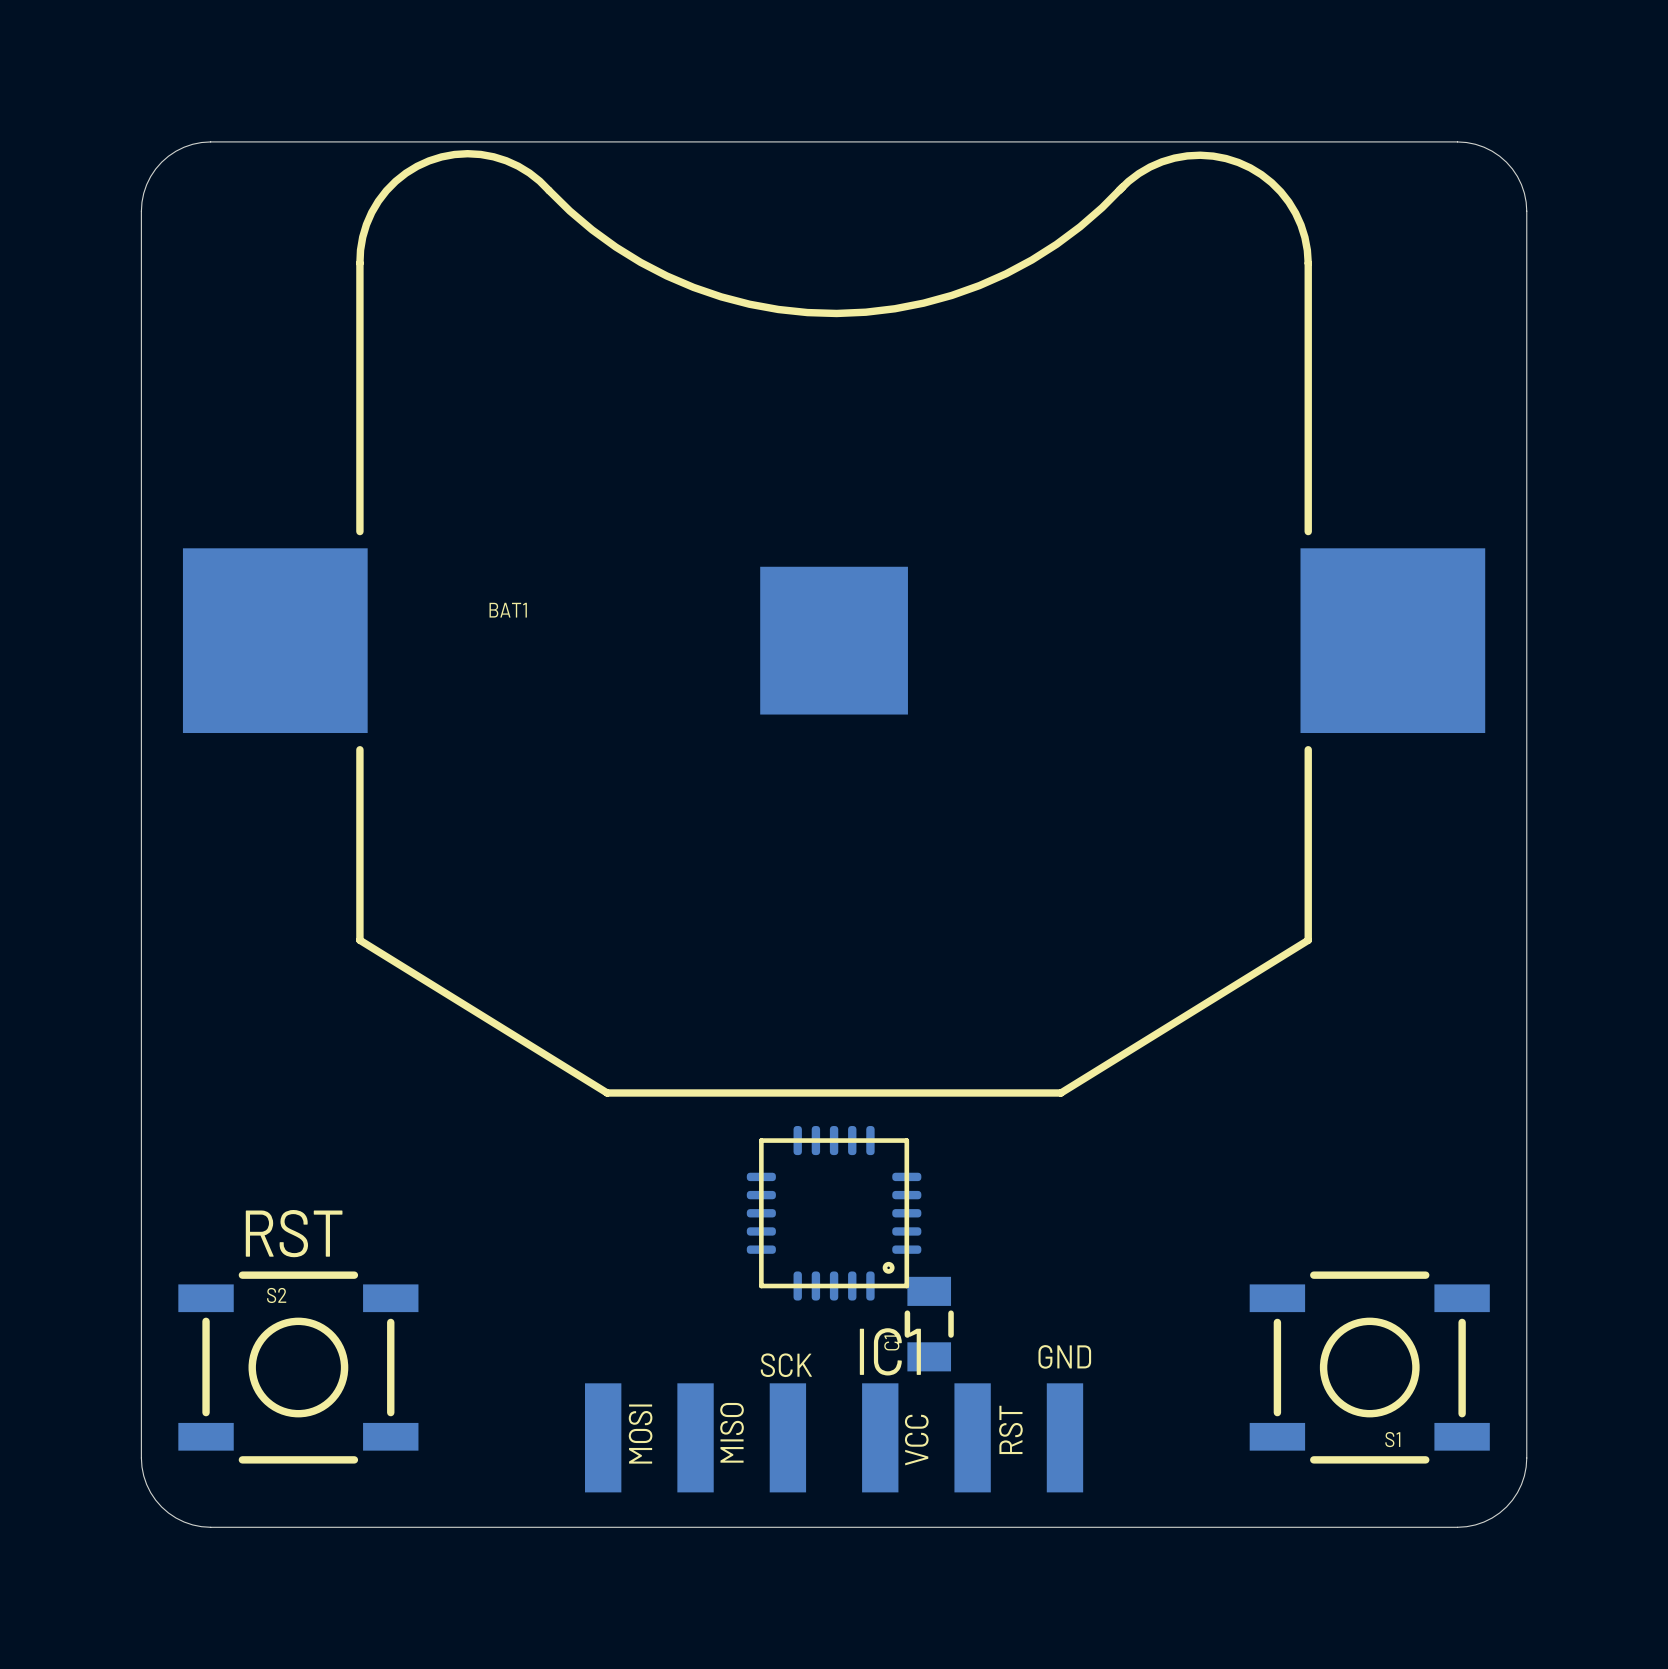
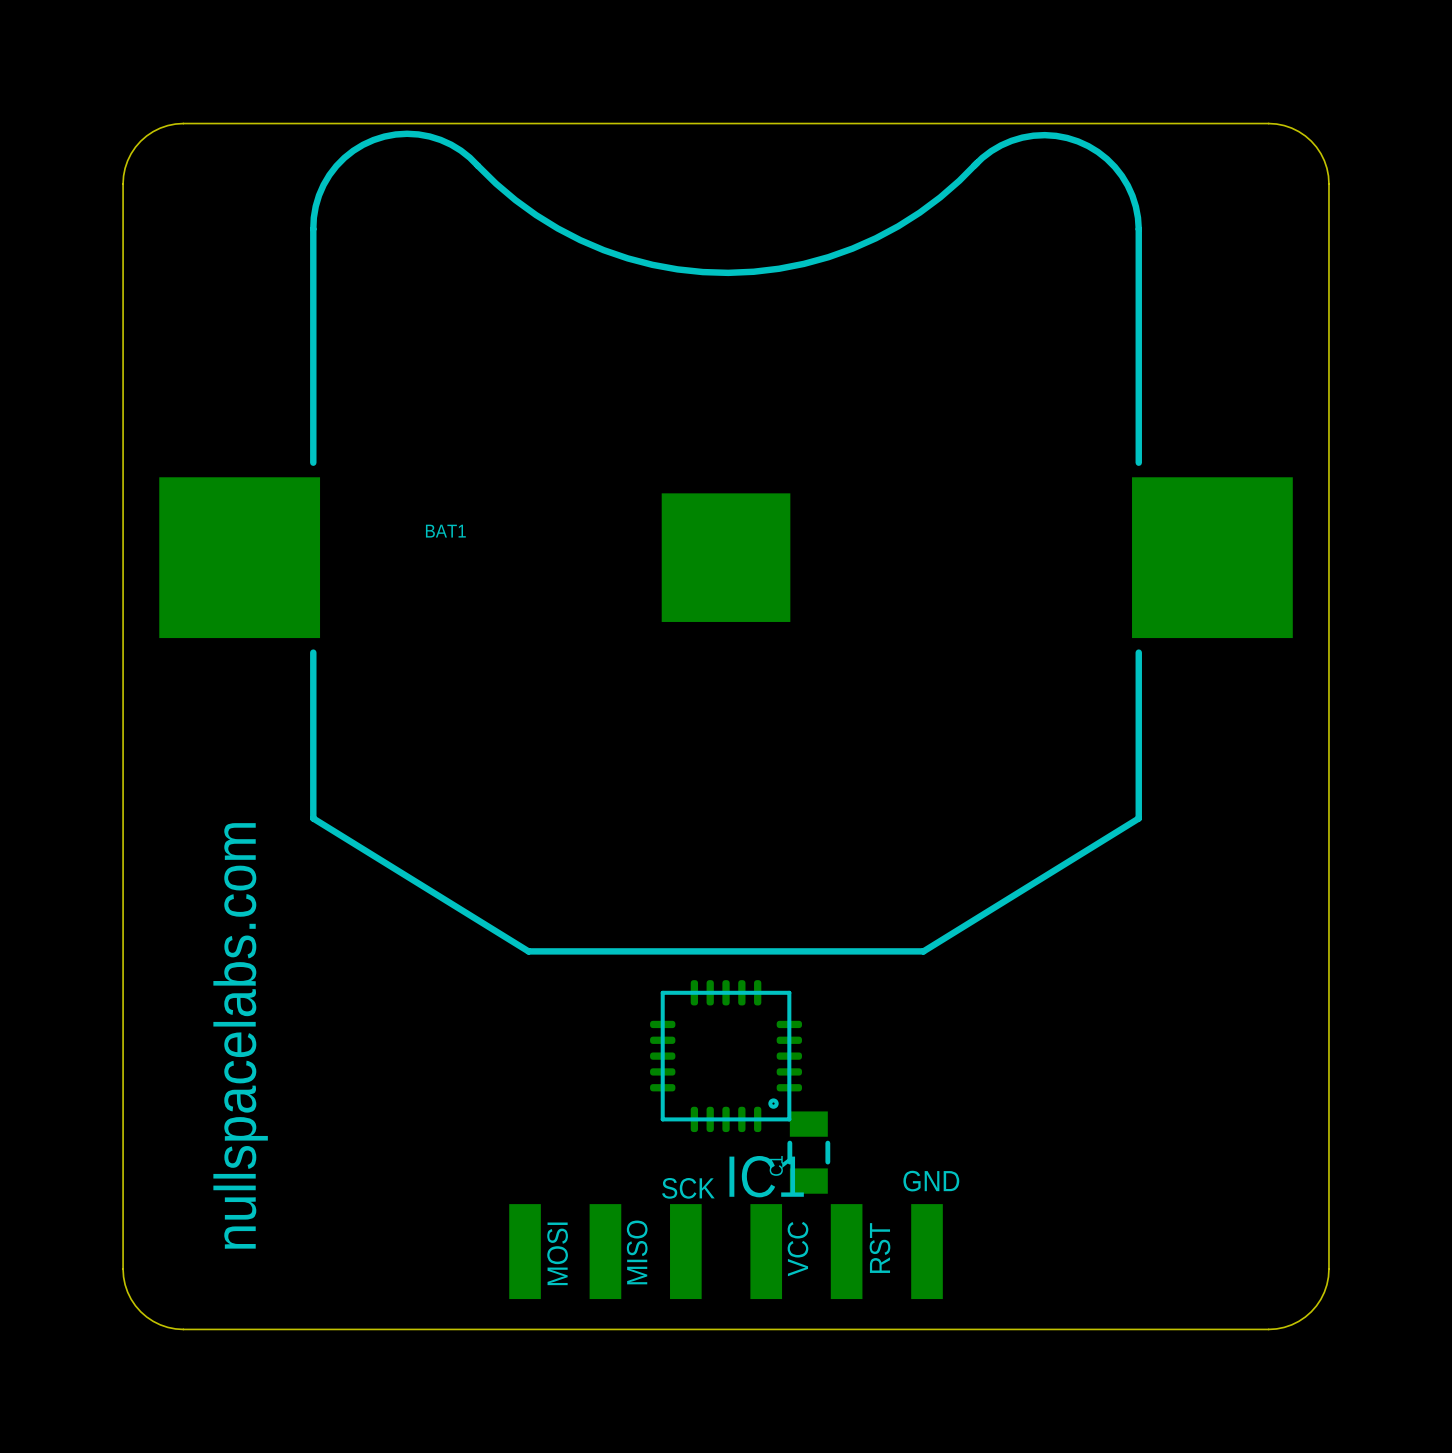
text: none -> nullspacelabs.com (240, 1035)
text: RST (294, 1233) -> none
S2: (298, 1367) -> none
S1: (1369, 1367) -> none

